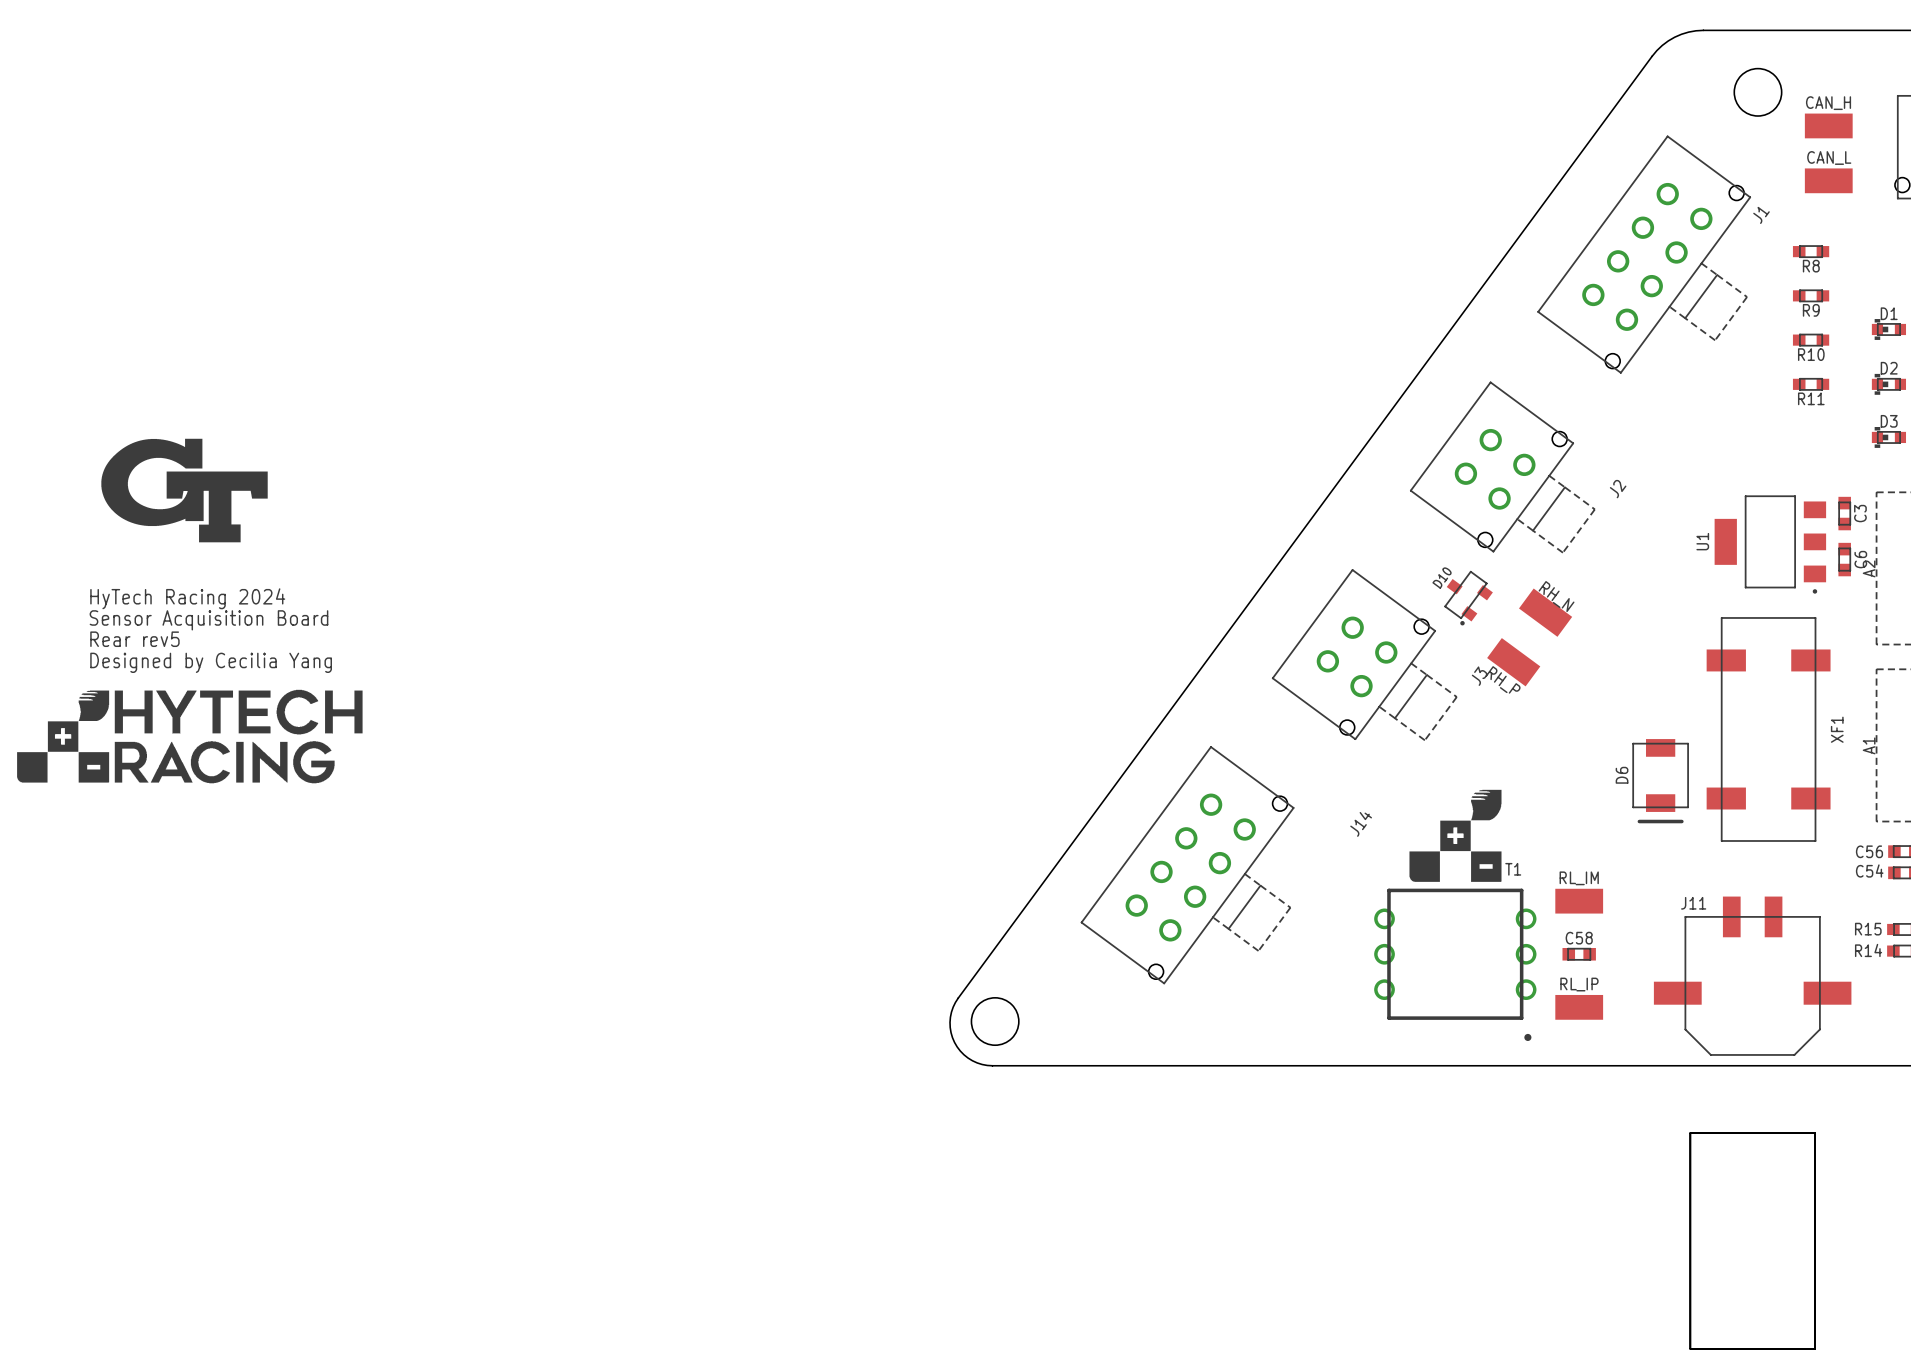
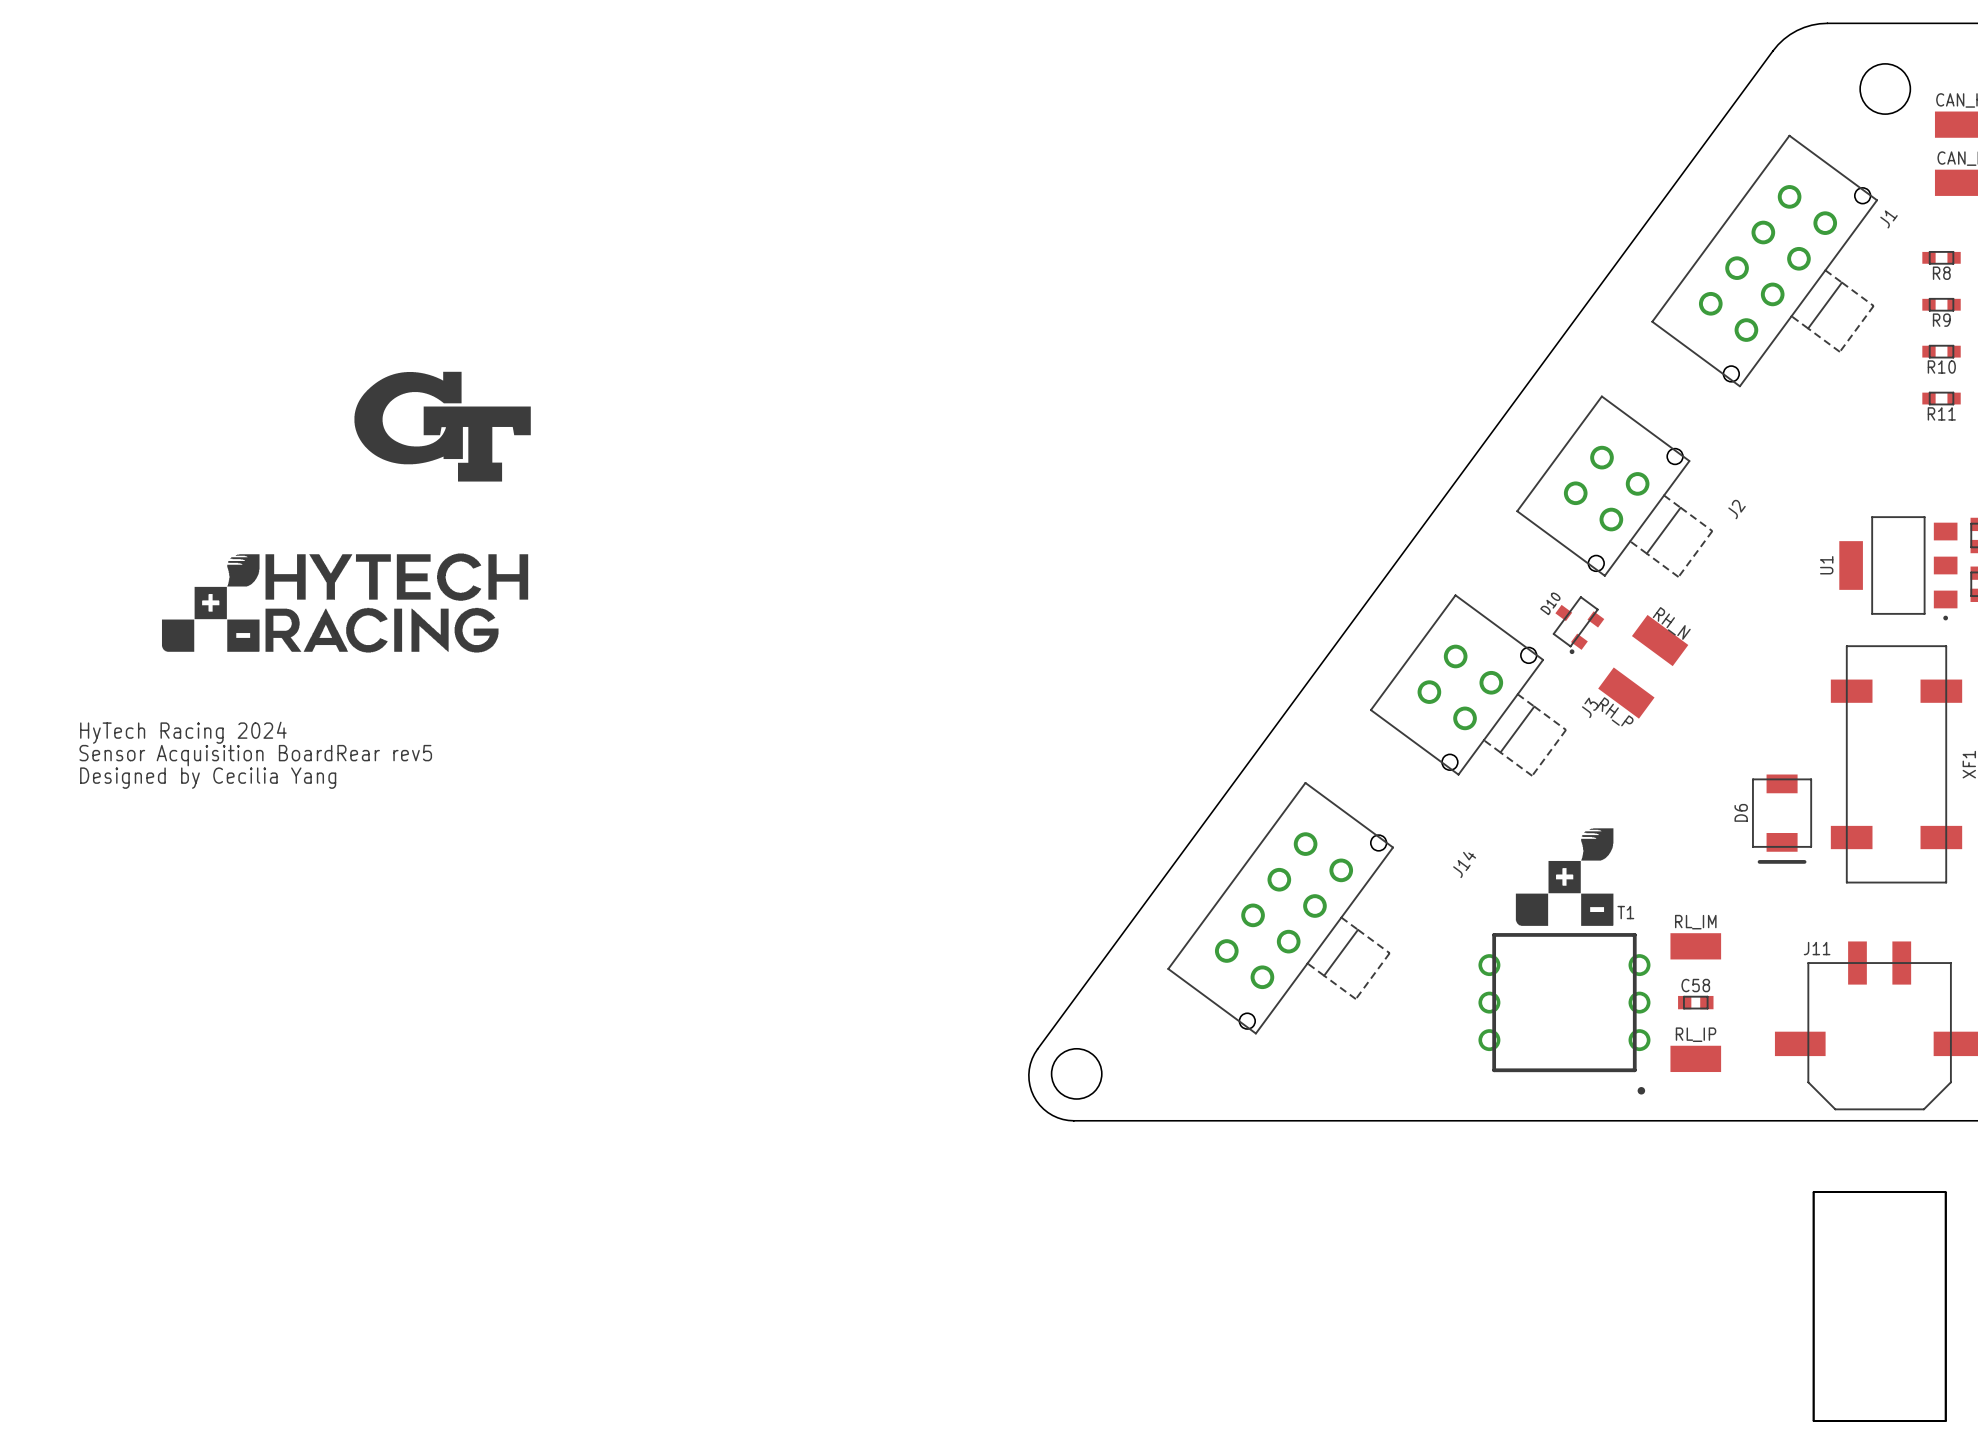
drawing position: (184, 490) -> (442, 426)
text position: HyTech Racing 2024 (187, 598) -> HyTech Racing 2024 (183, 732)
text: Sensor Acquisition Board (208, 620) -> none
text: Rear rev5 (134, 639) -> none
text position: Designed by Cecilia Yang (211, 662) -> Designed by Cecilia Yang (208, 778)
text: none -> Sensor Acquisition BoardRear rev5 (255, 755)
drawing position: (189, 736) -> (345, 603)

